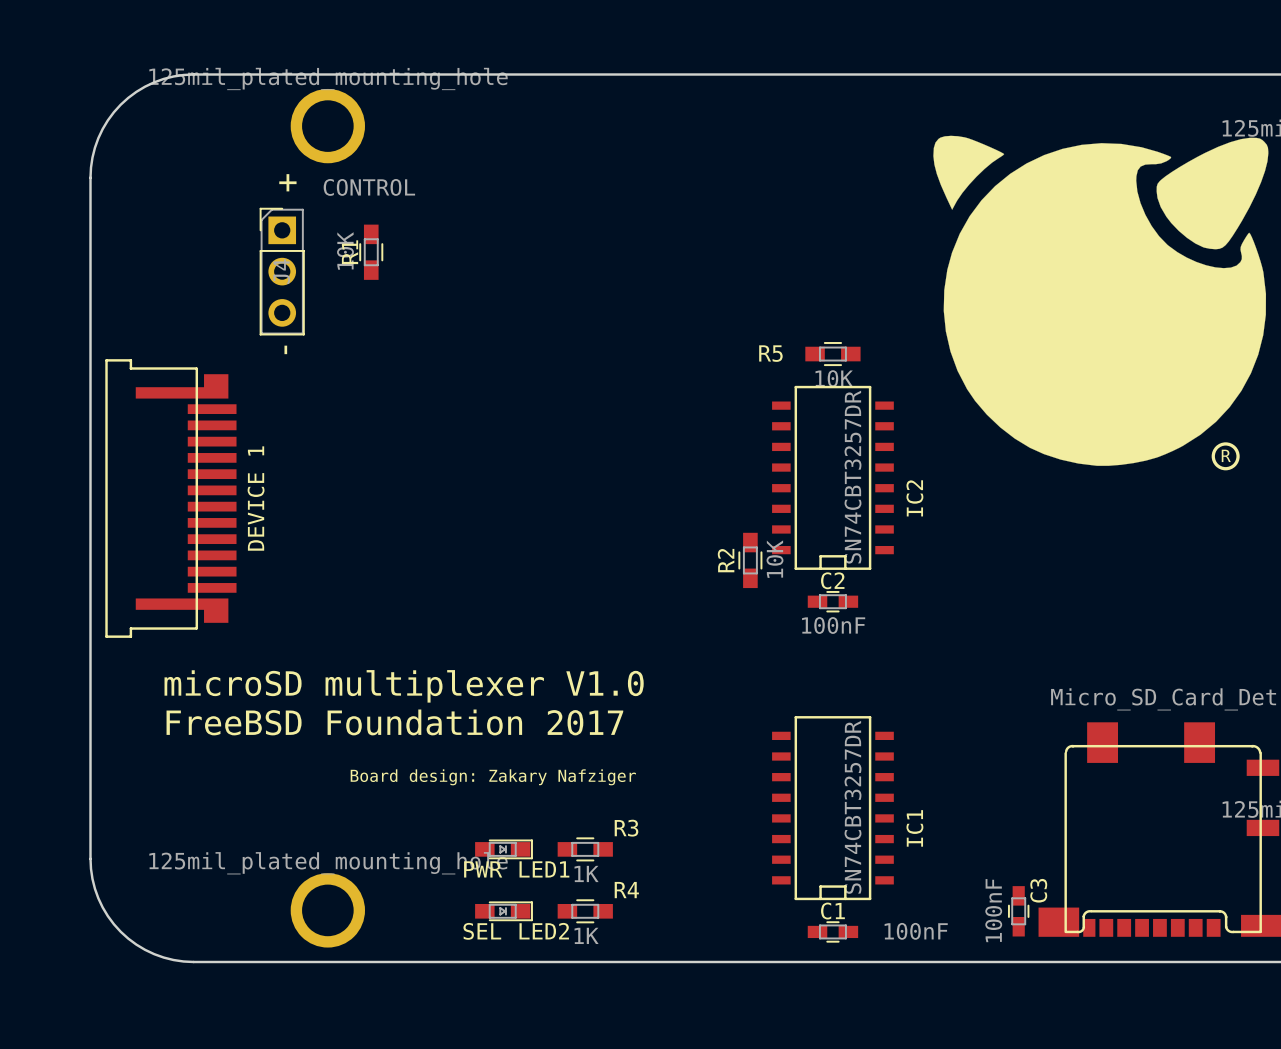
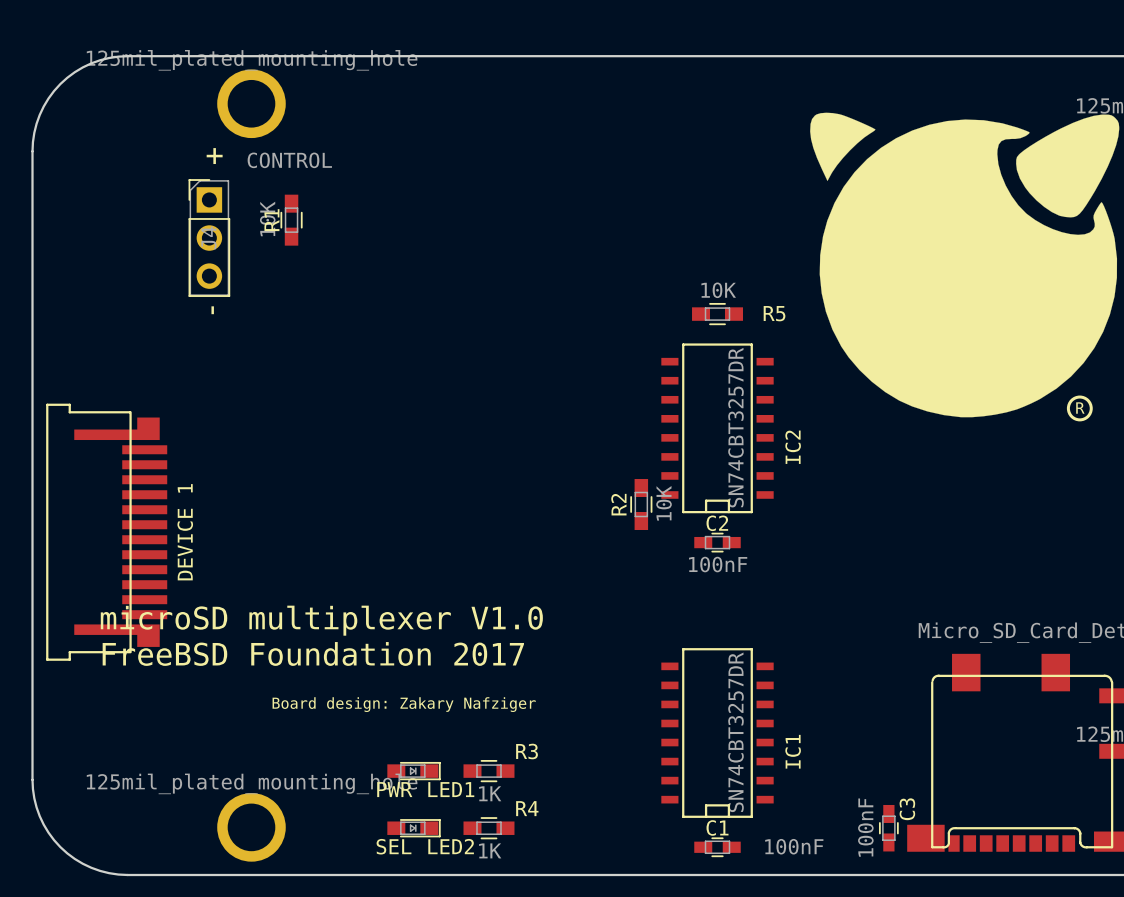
R5 name position: R5 (770, 353) -> R5 (774, 313)
R5 value position: 10K (834, 378) -> 10K (718, 290)
part position: (170, 498) -> (106, 532)

